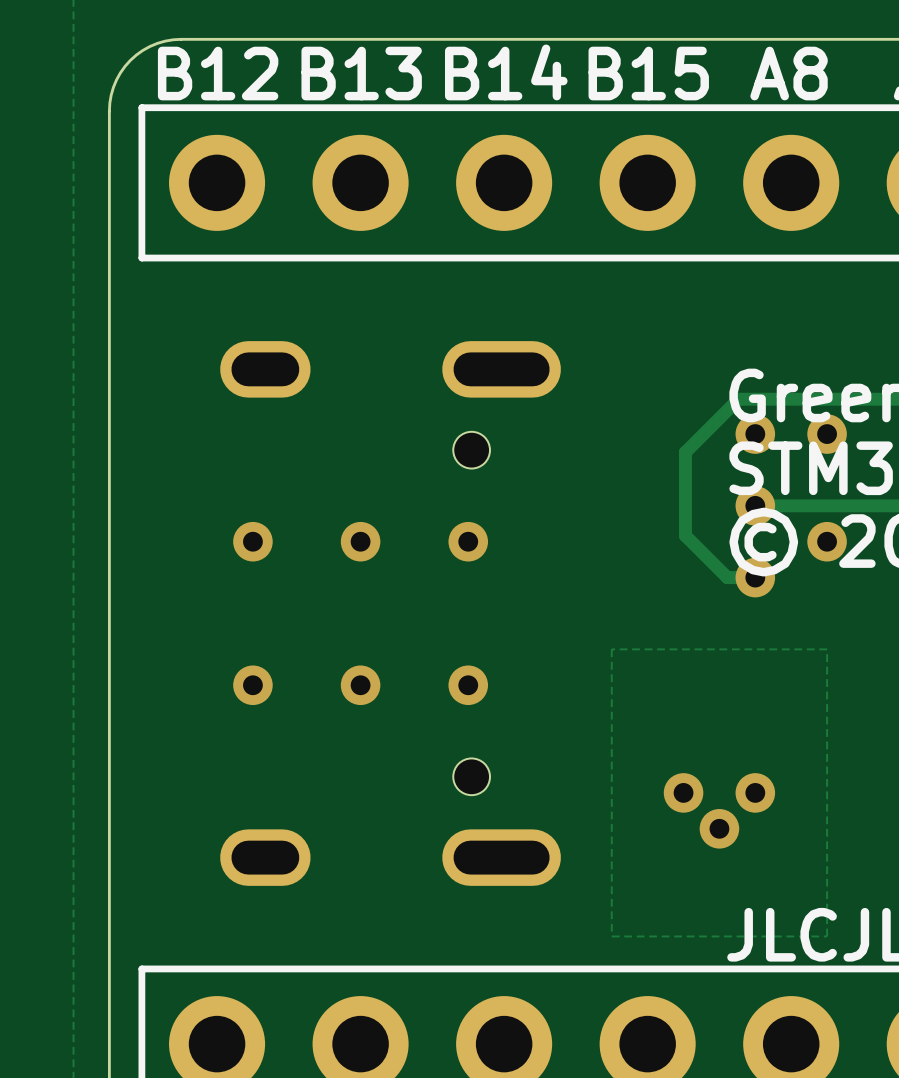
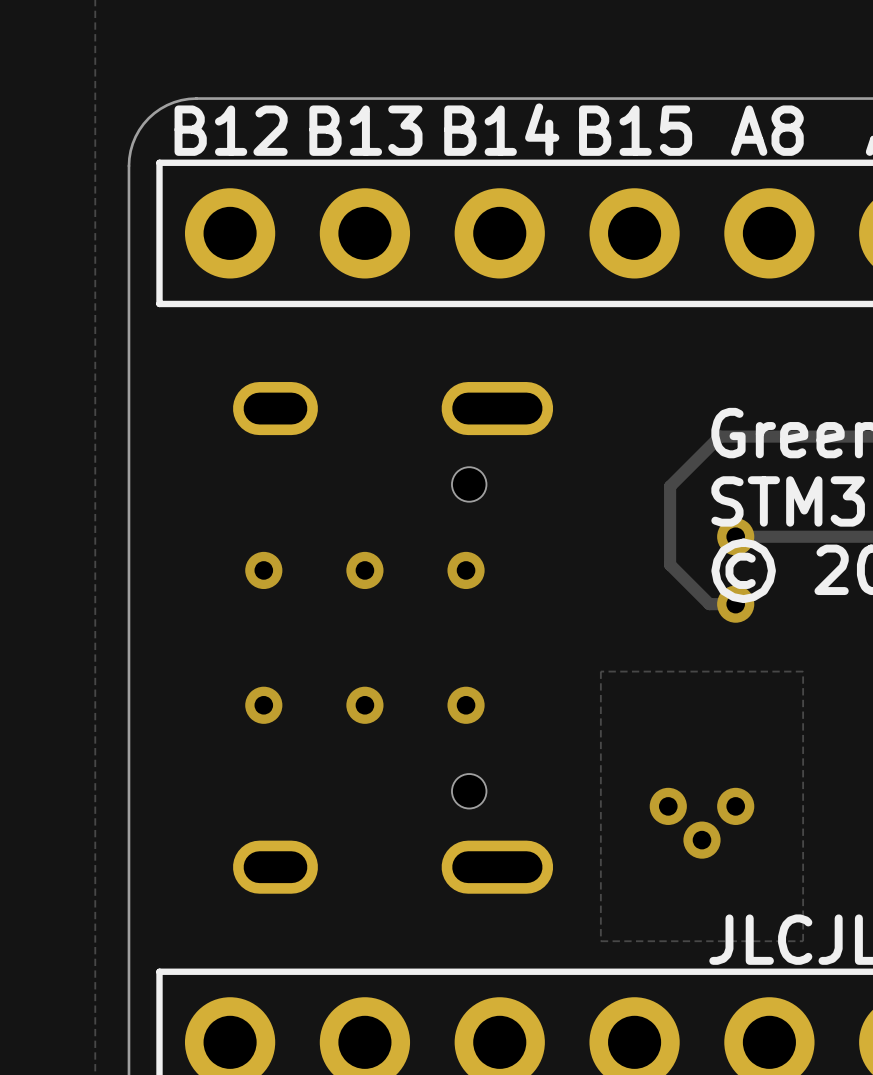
via: (755, 434) -> none
via: (827, 434) -> none
via: (827, 541) -> none

